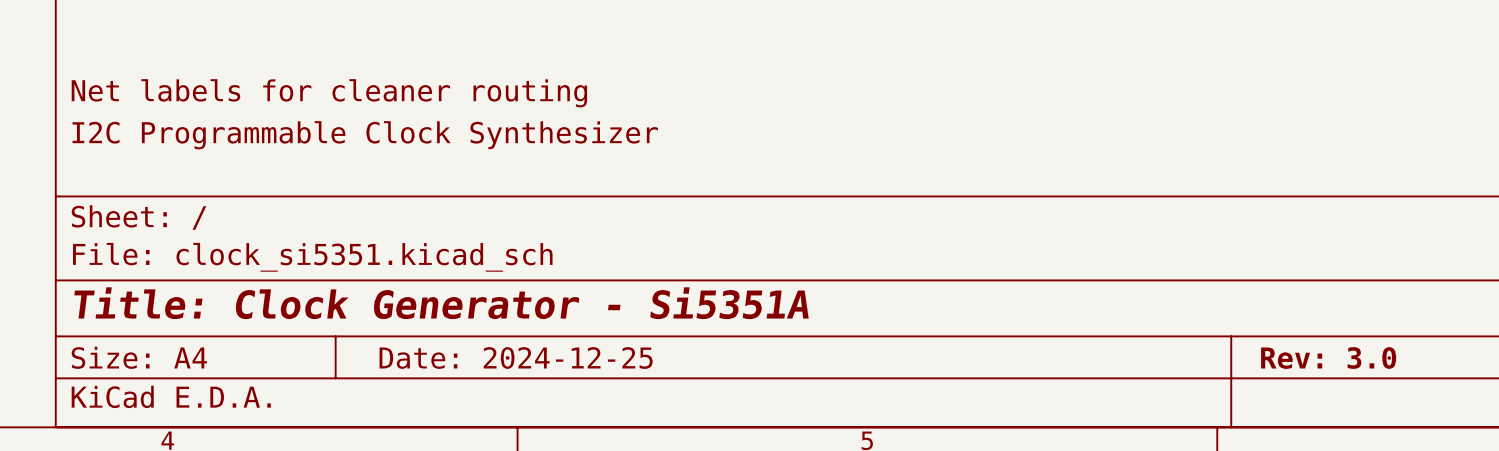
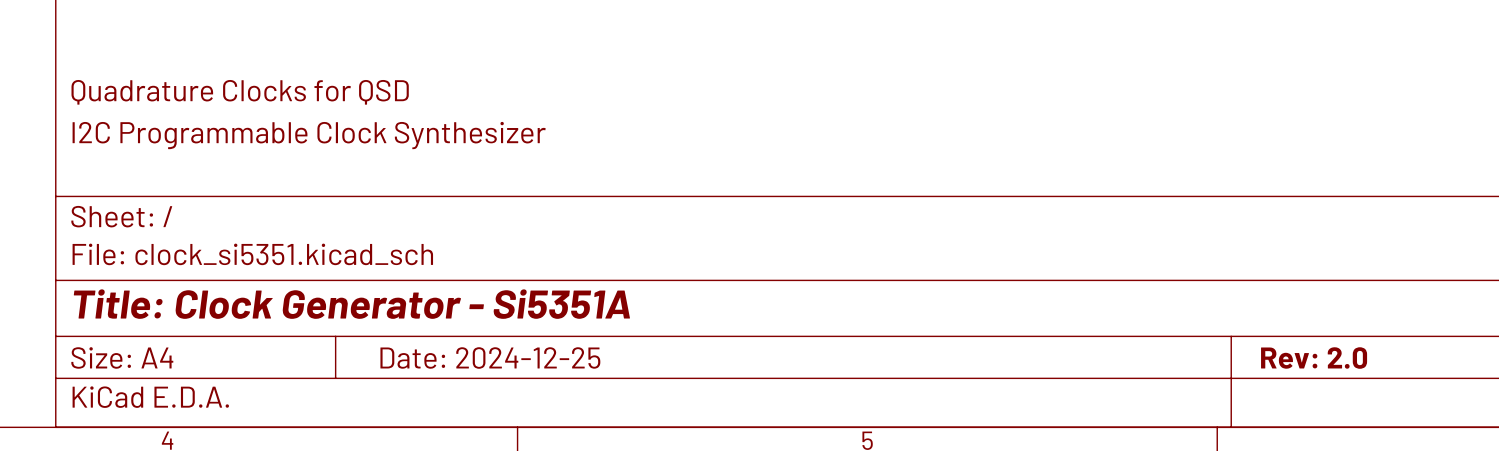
title block: Net labels for cleaner routing (329, 93) -> Quadrature Clocks for QSD (240, 92)
title block: Rev: 3.0 (1328, 358) -> Rev: 2.0 (1314, 358)

